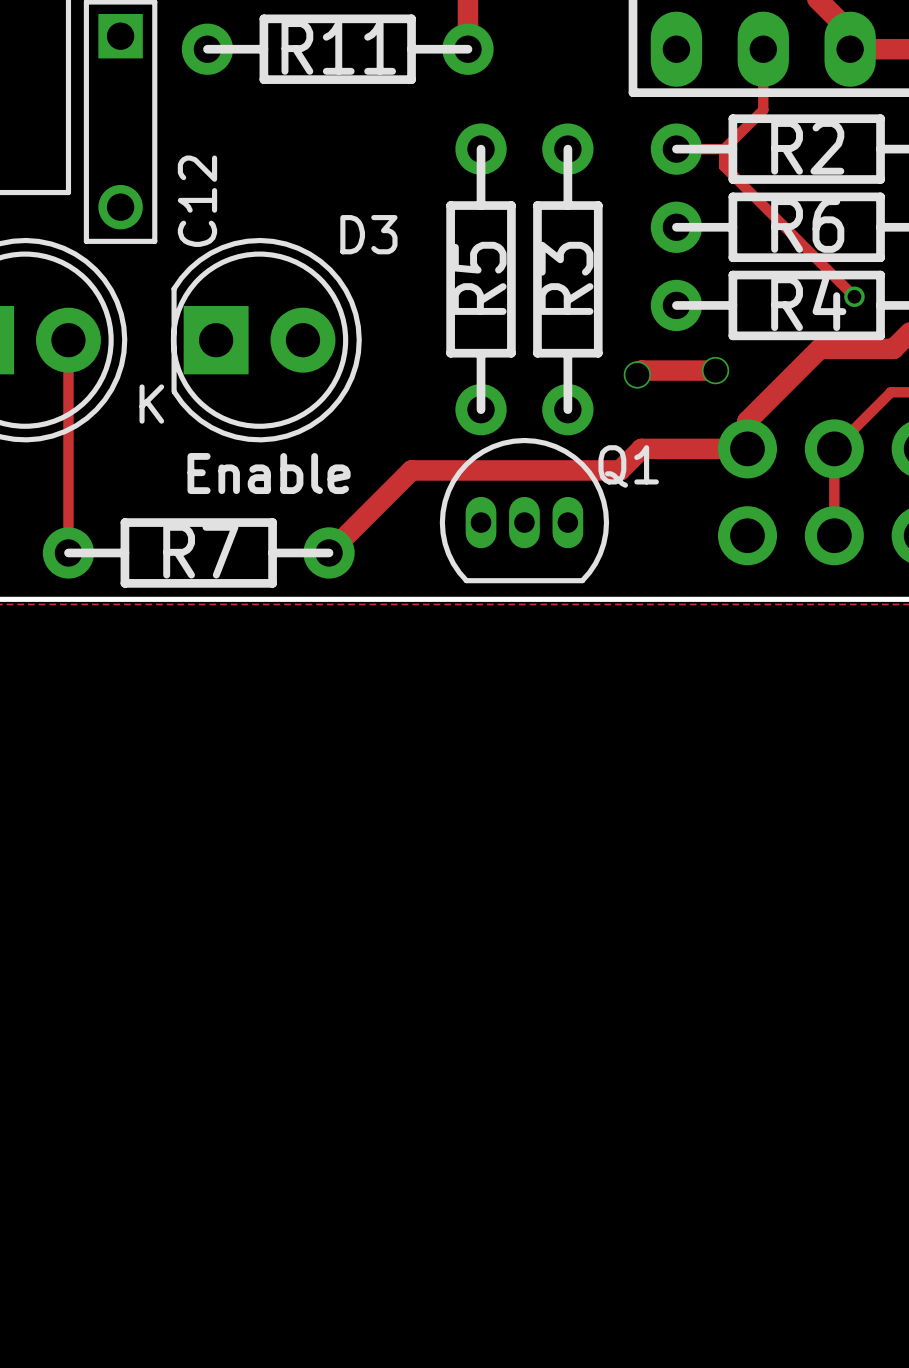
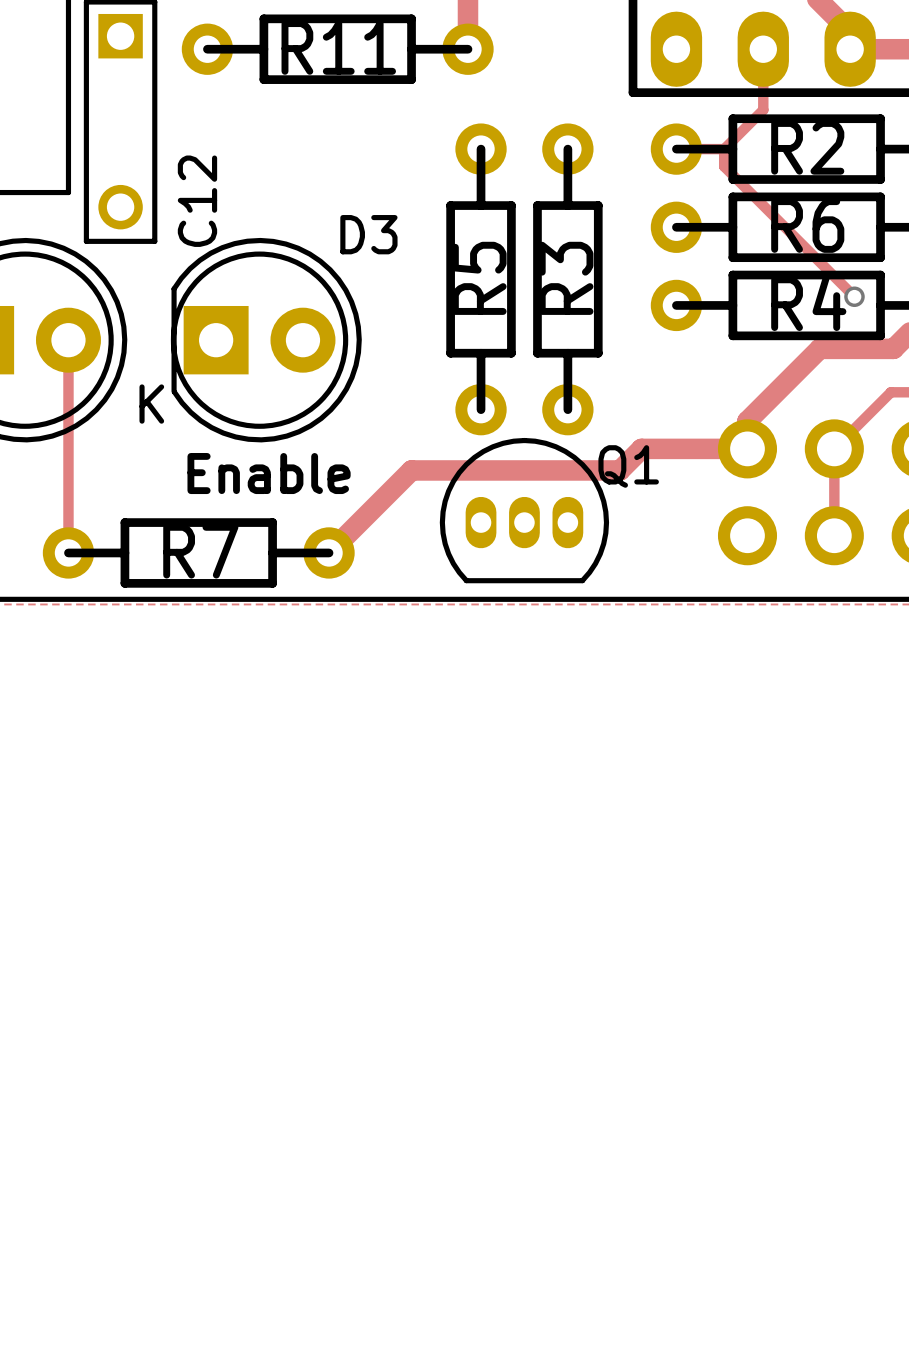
track: (715, 370) (641, 370) (637, 374) -> none
via: (715, 370) -> none
via: (637, 374) -> none

